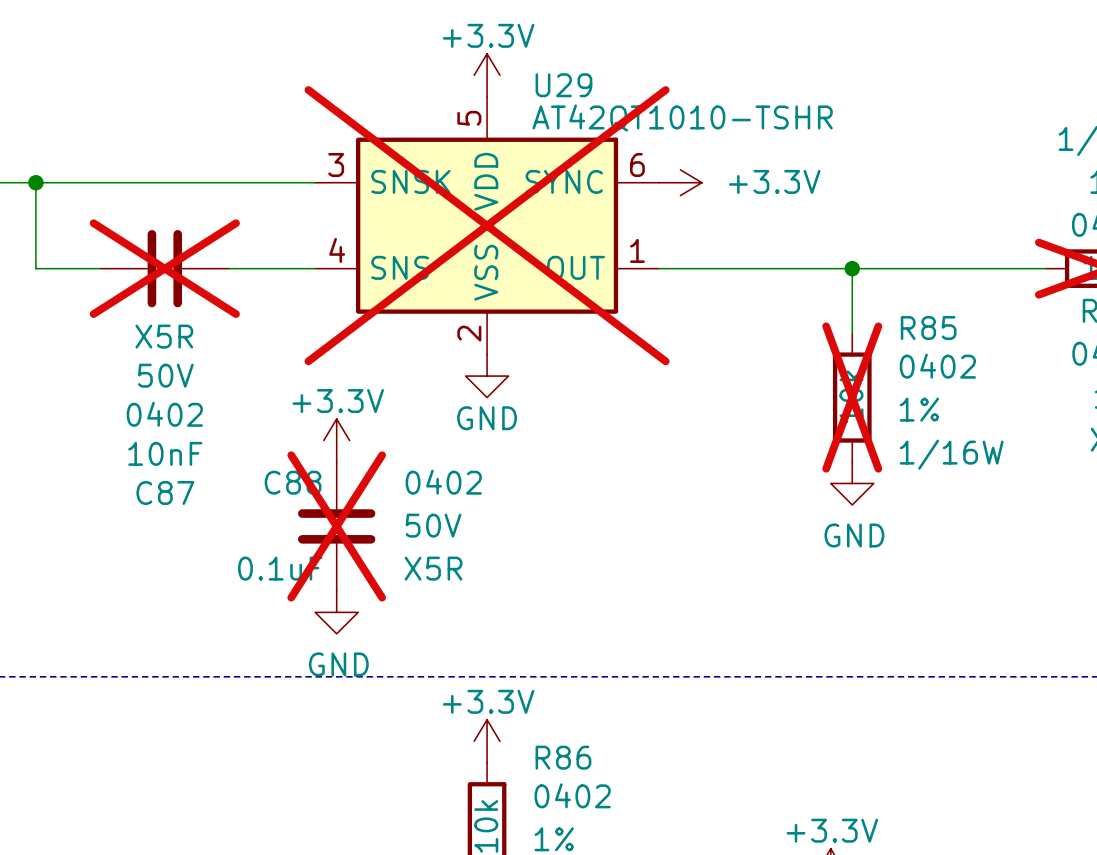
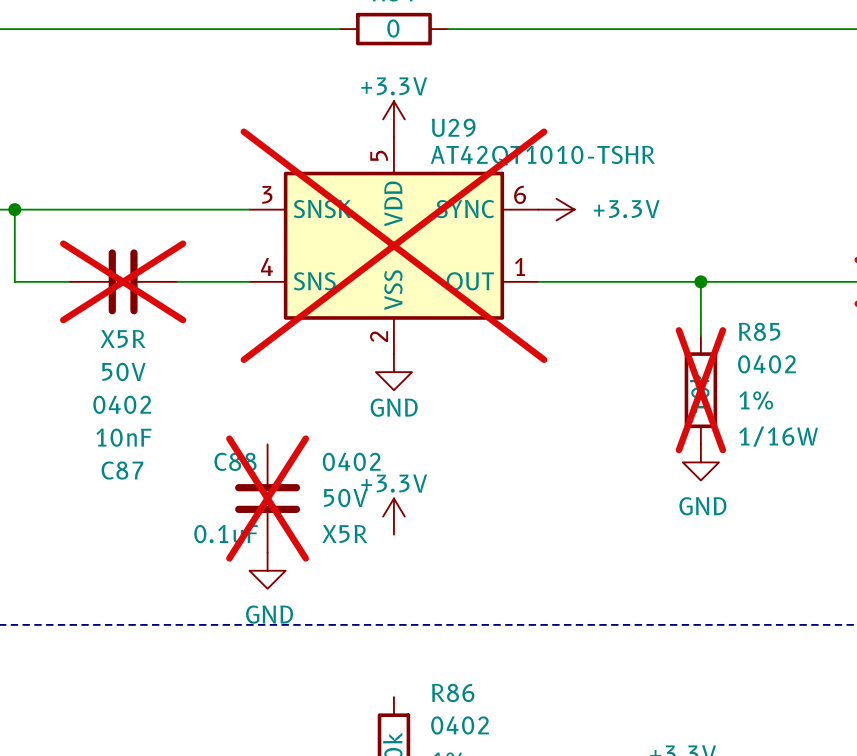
power symbol: +3.3V (336, 440) -> none
power symbol: none -> +3.3V (393, 516)
power symbol: +3.3V (487, 741) -> none

